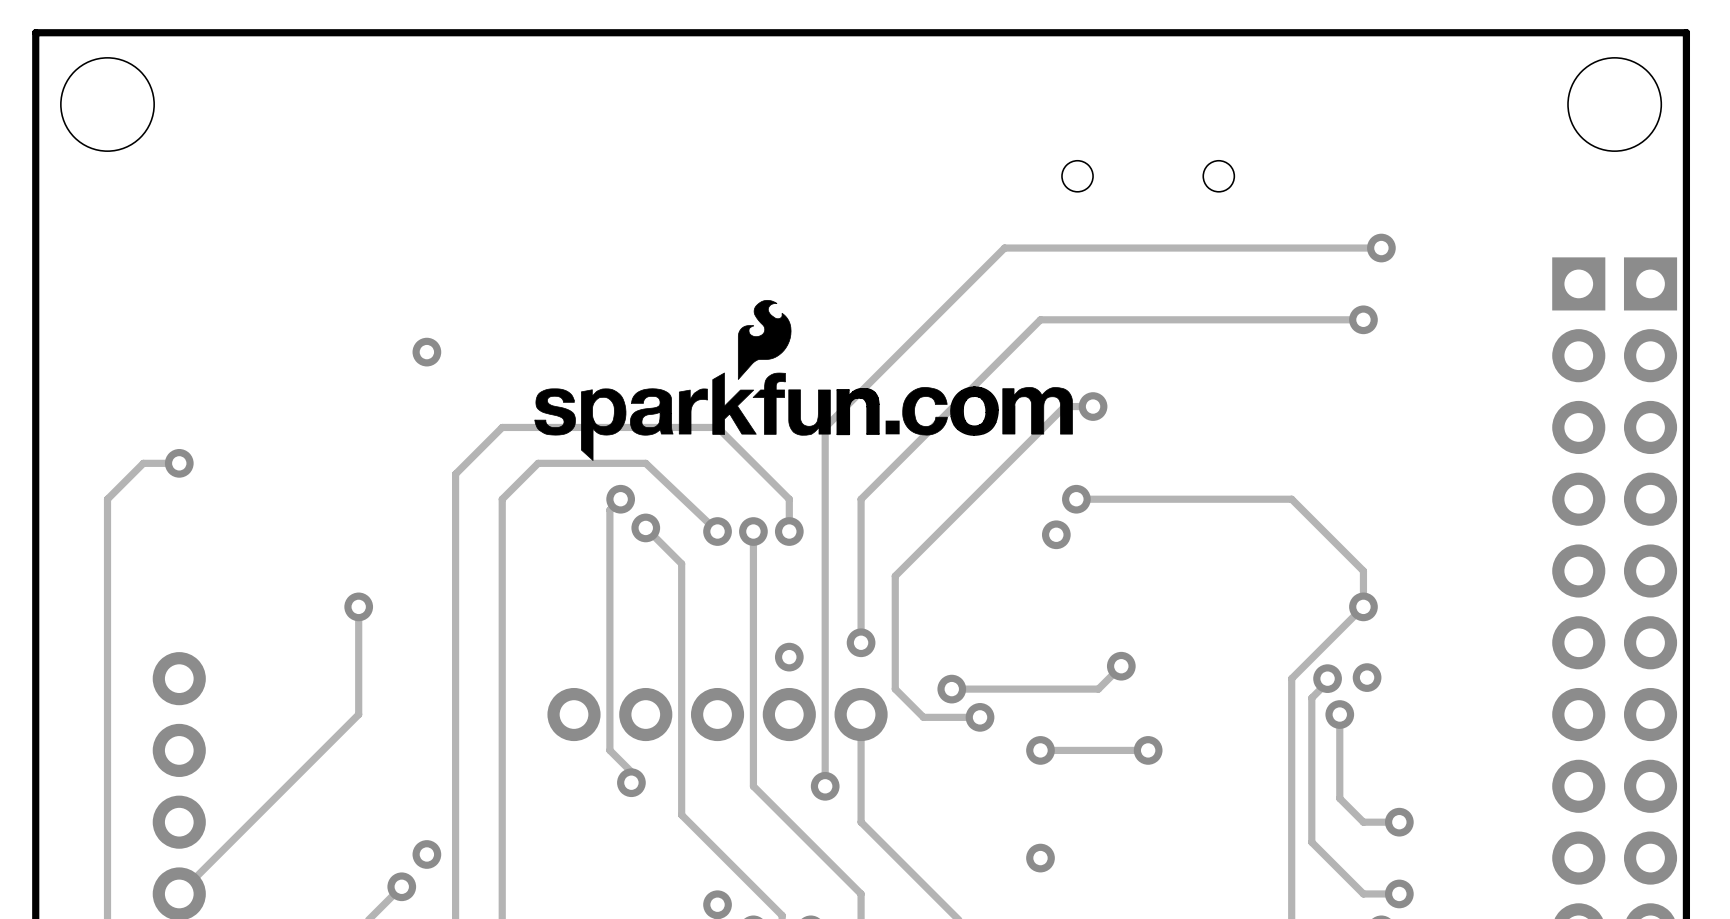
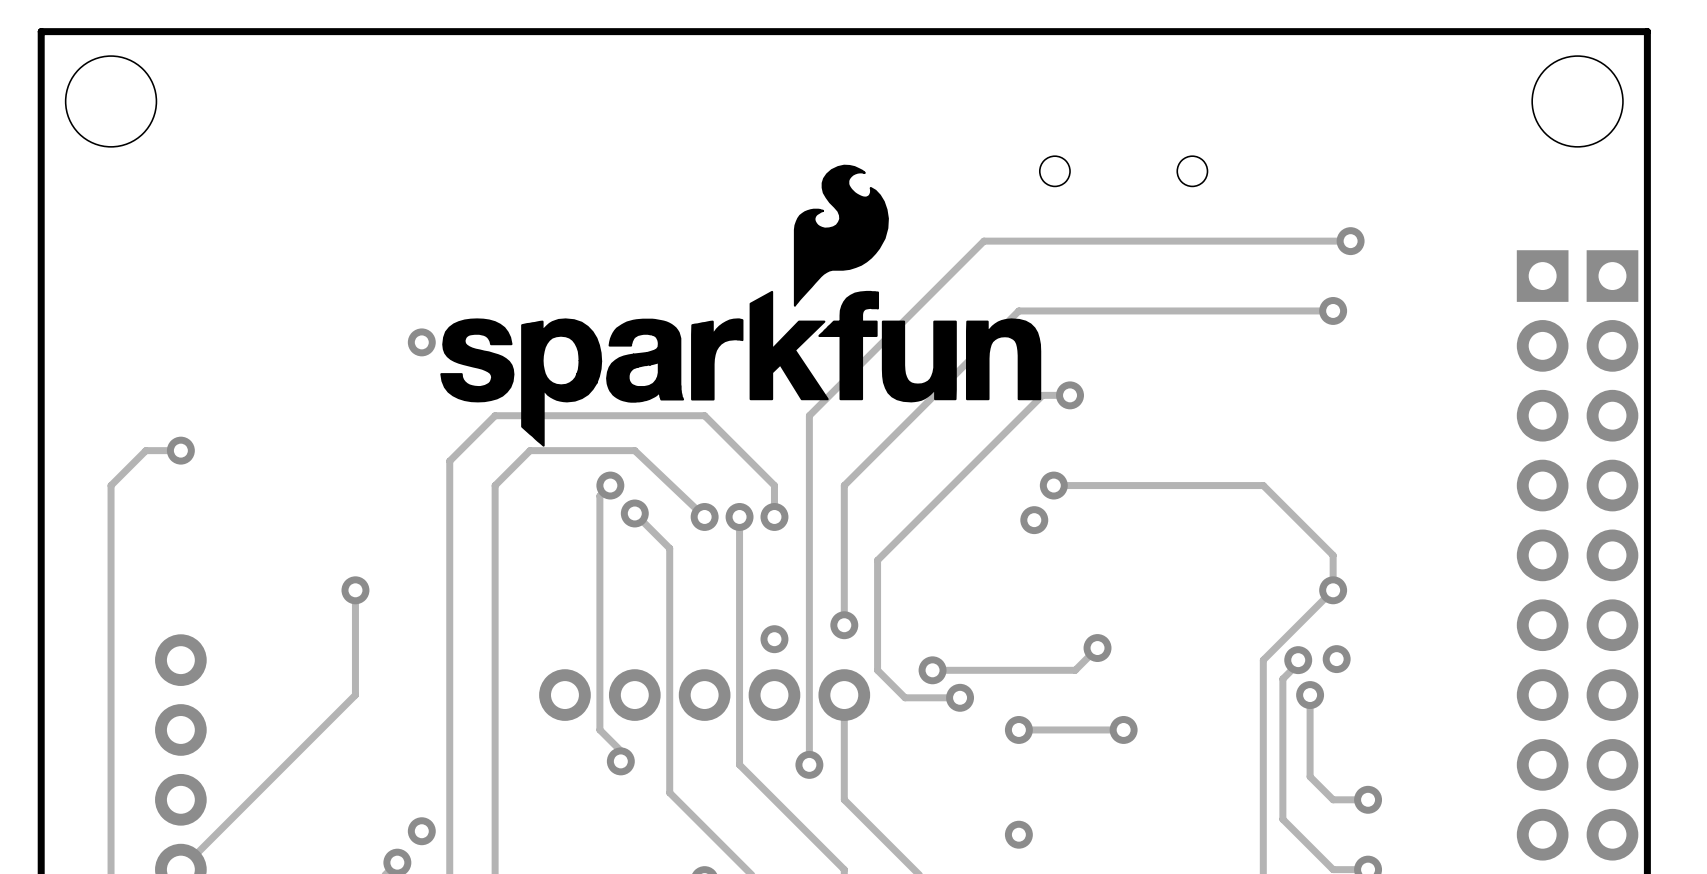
drawing: none -> [440, 164, 1042, 447]
drawing: [534, 299, 1073, 461] -> none

